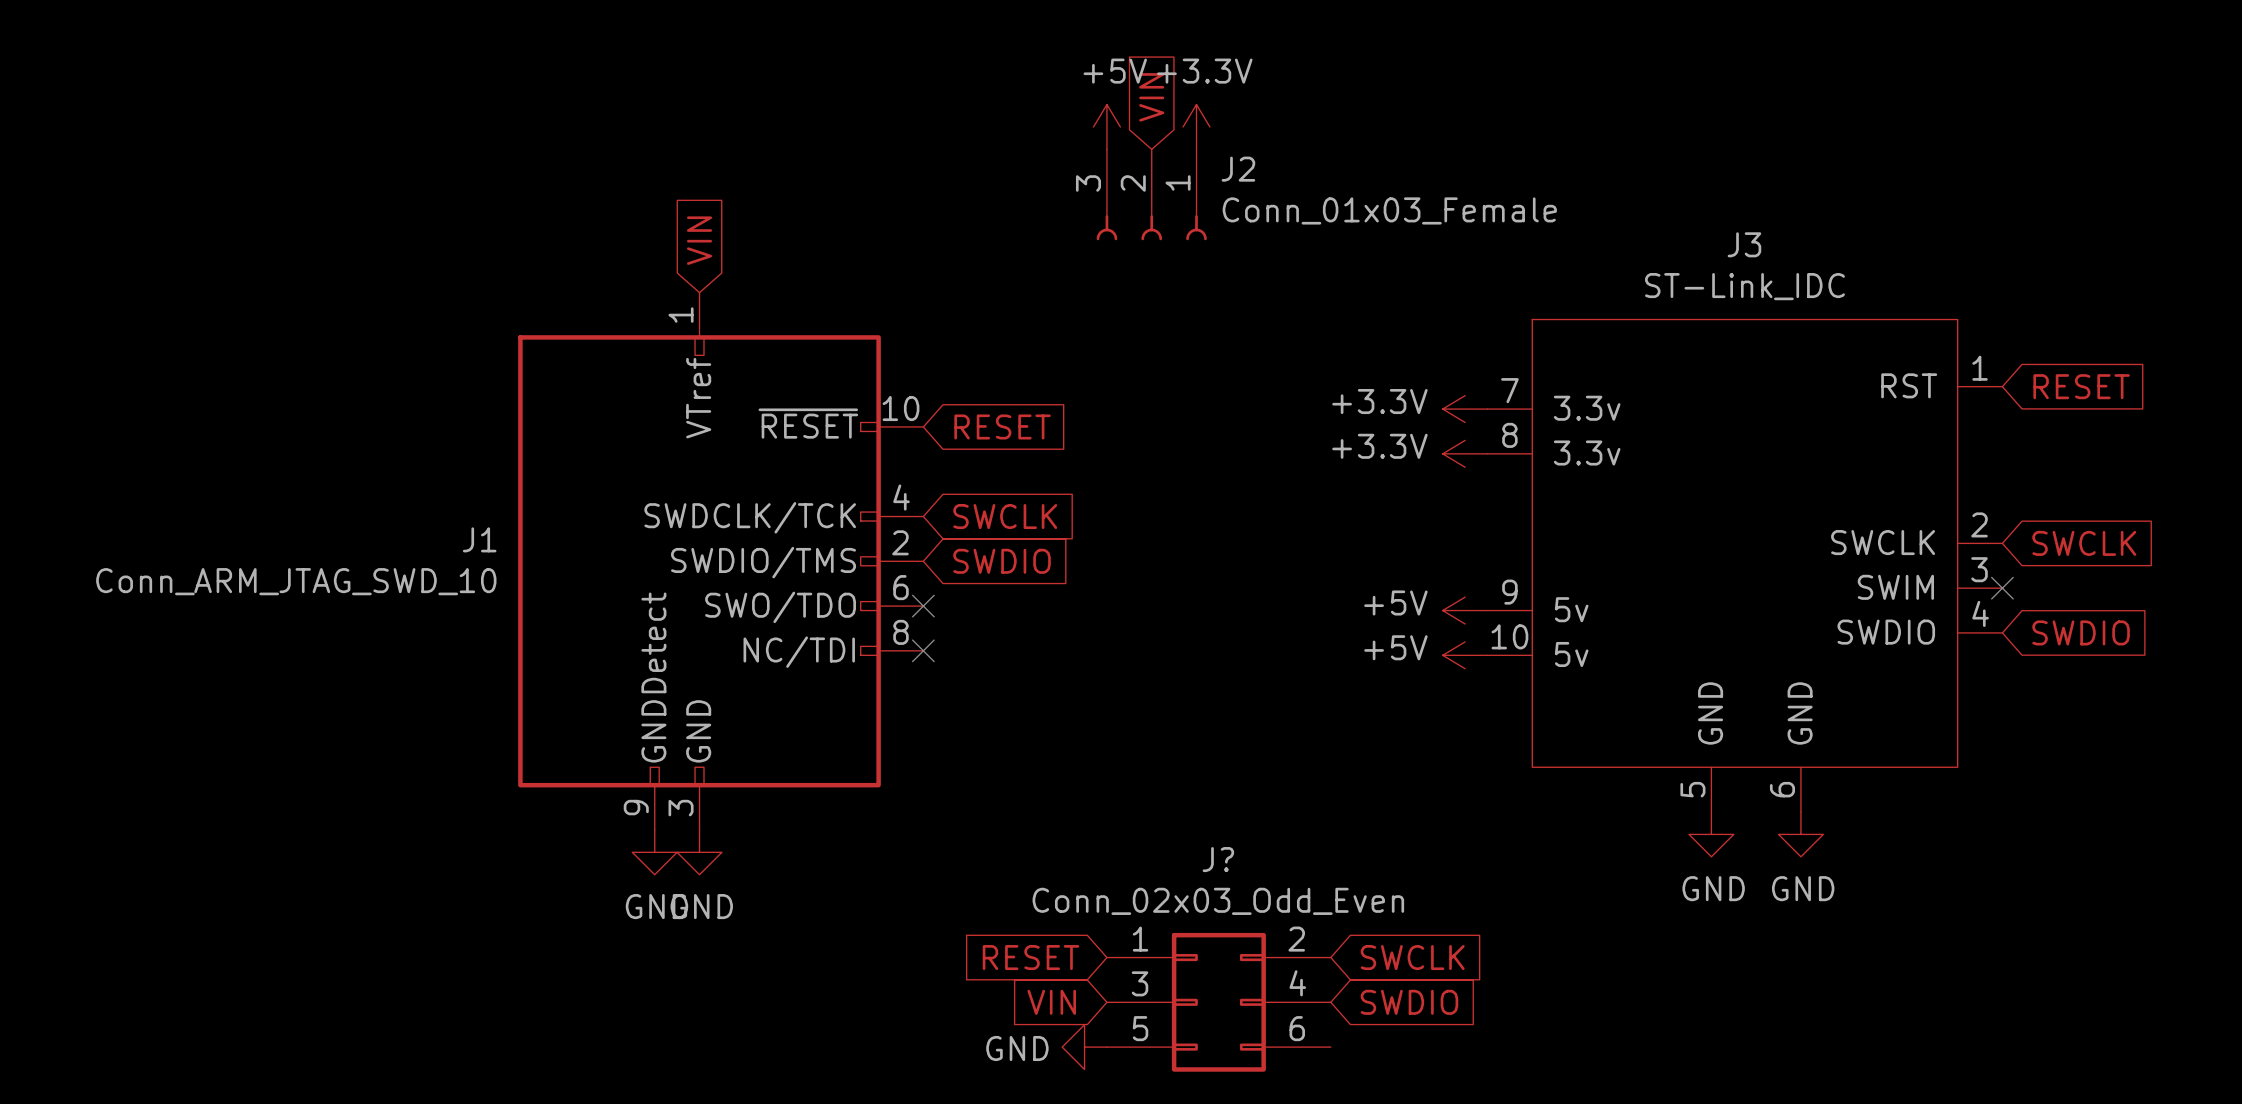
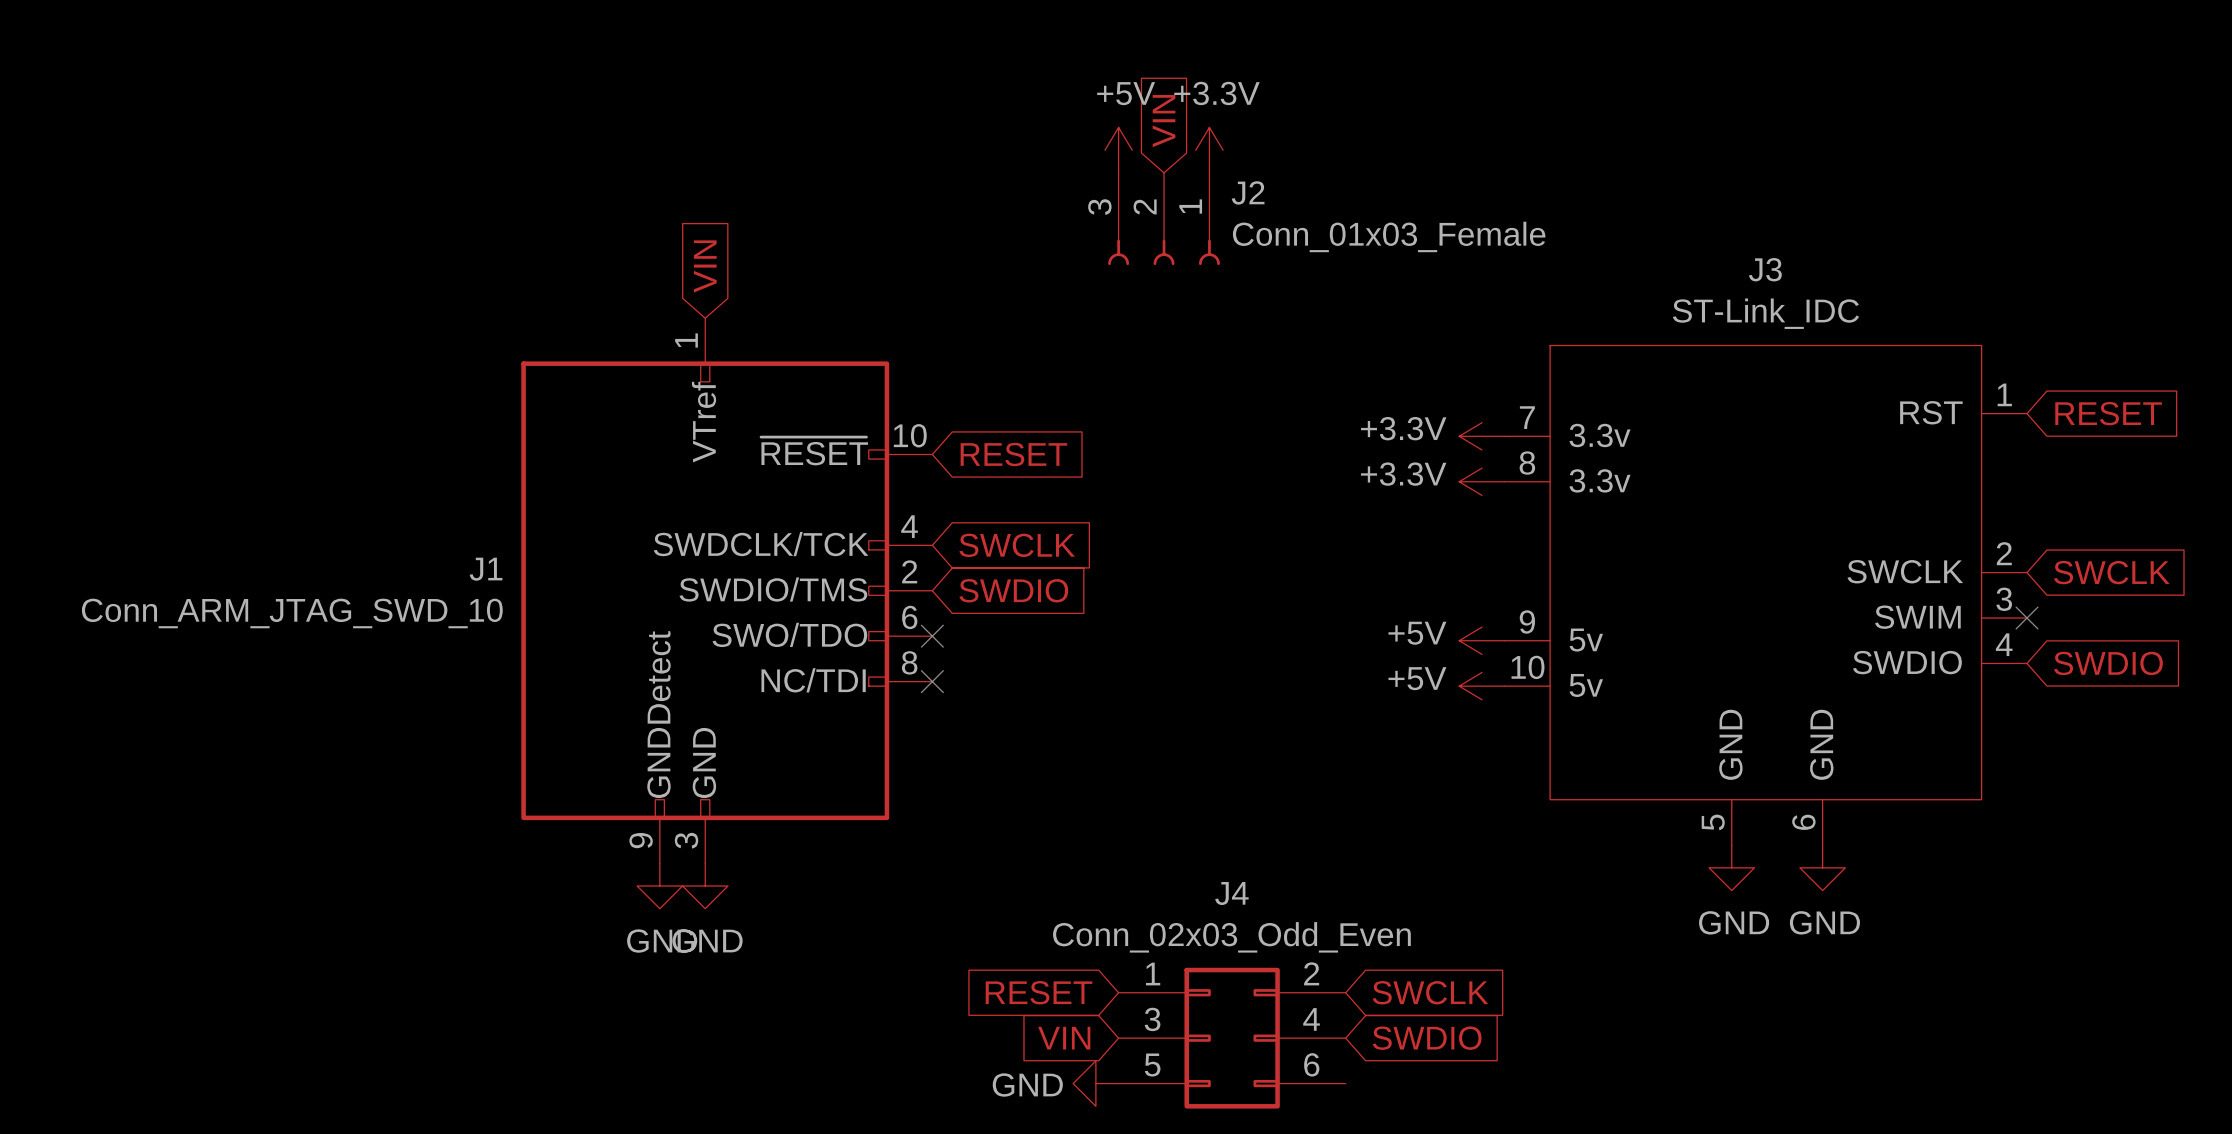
J? name: J? (1218, 859) -> J4 (1231, 893)

